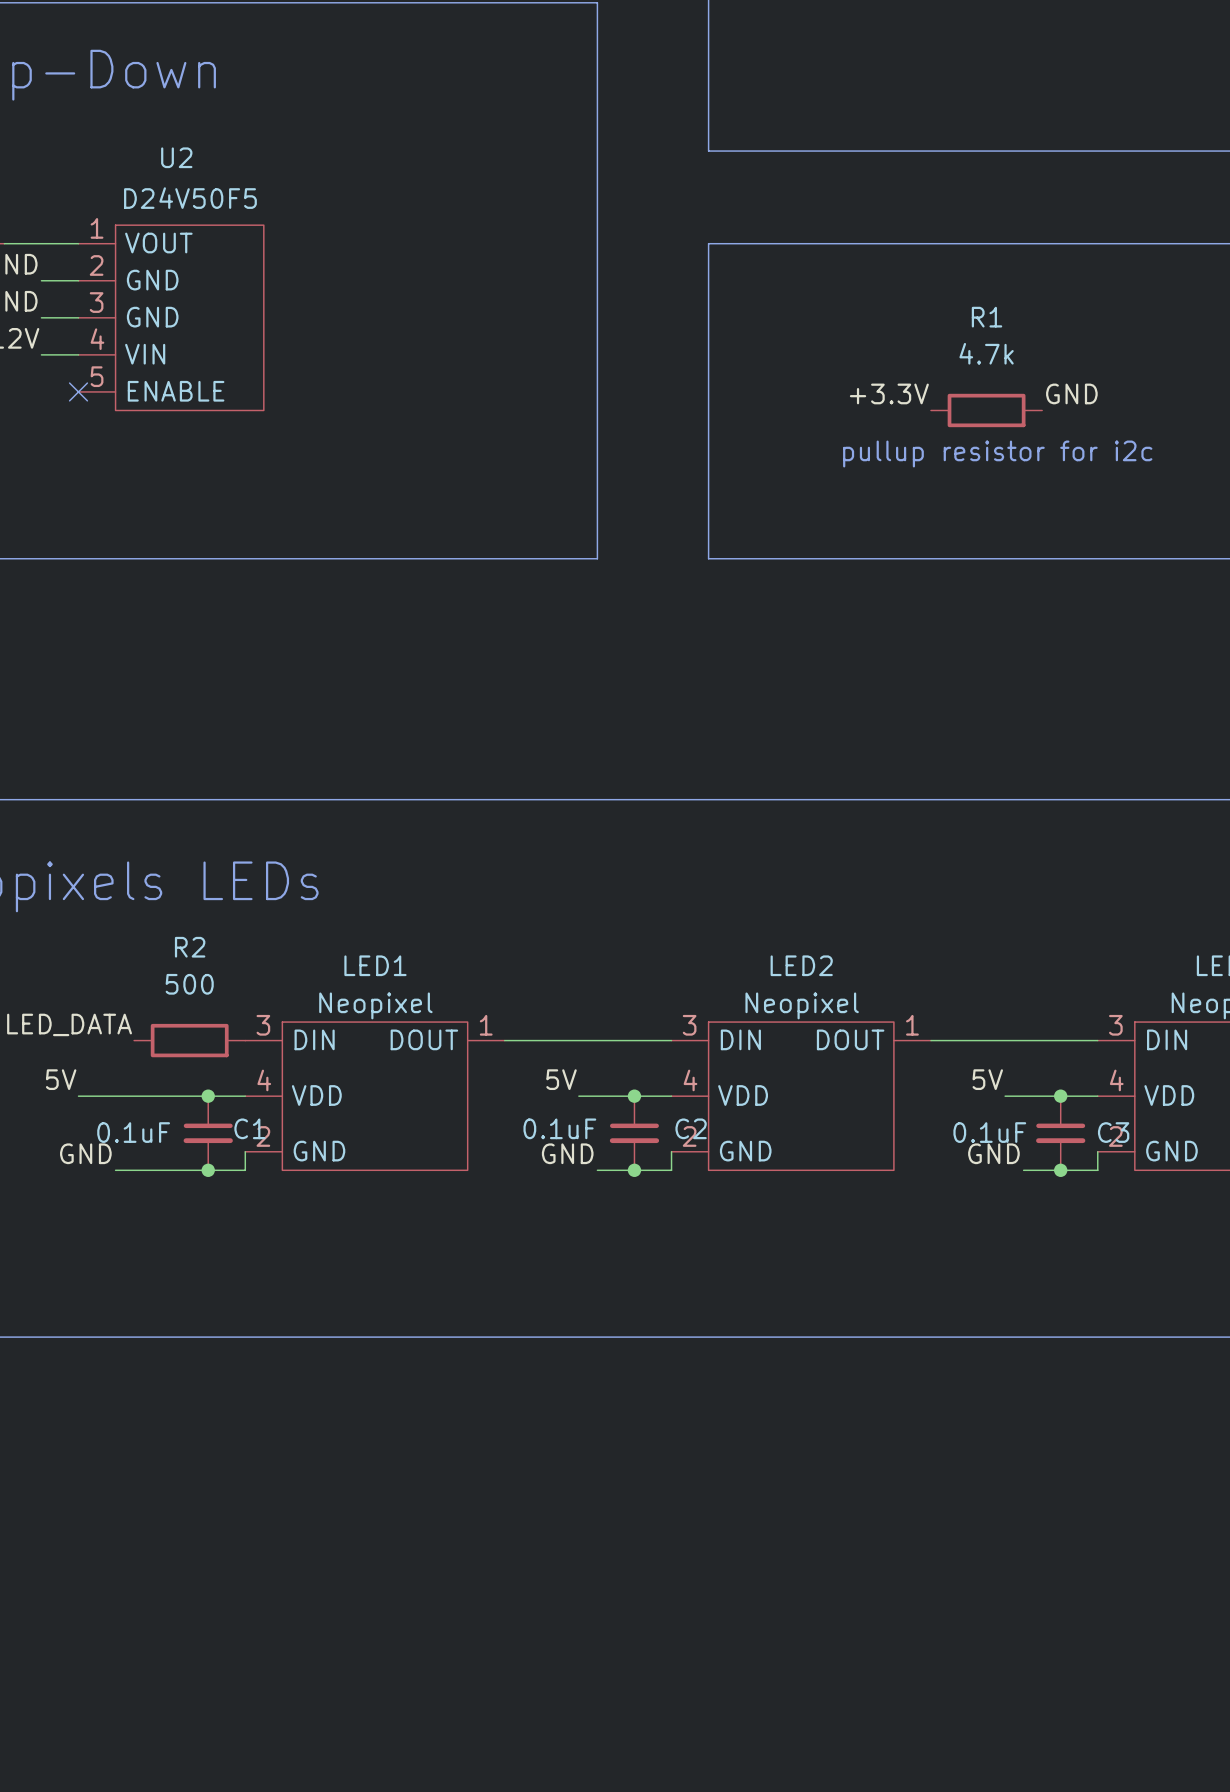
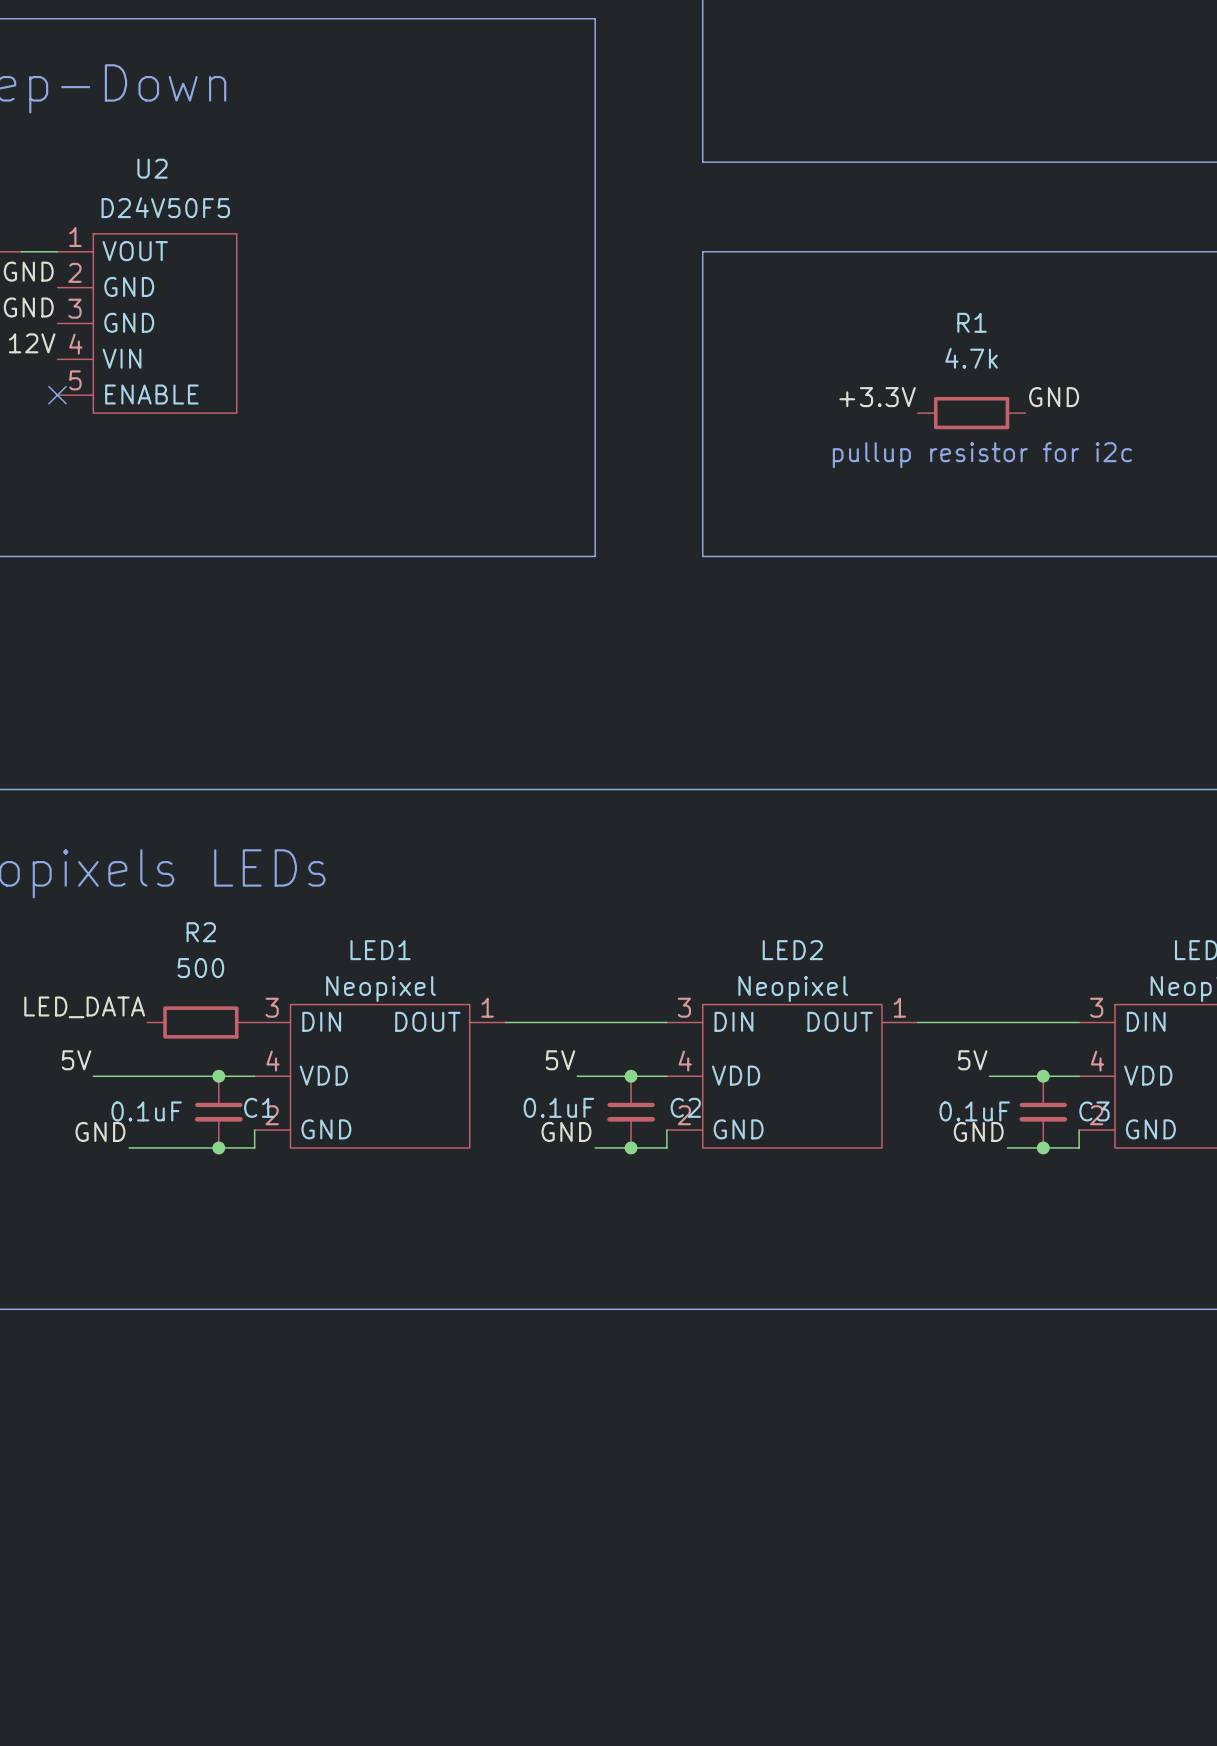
U2 position: (171, 317) -> (147, 323)
no-connect mark position: (78, 391) -> (57, 395)

